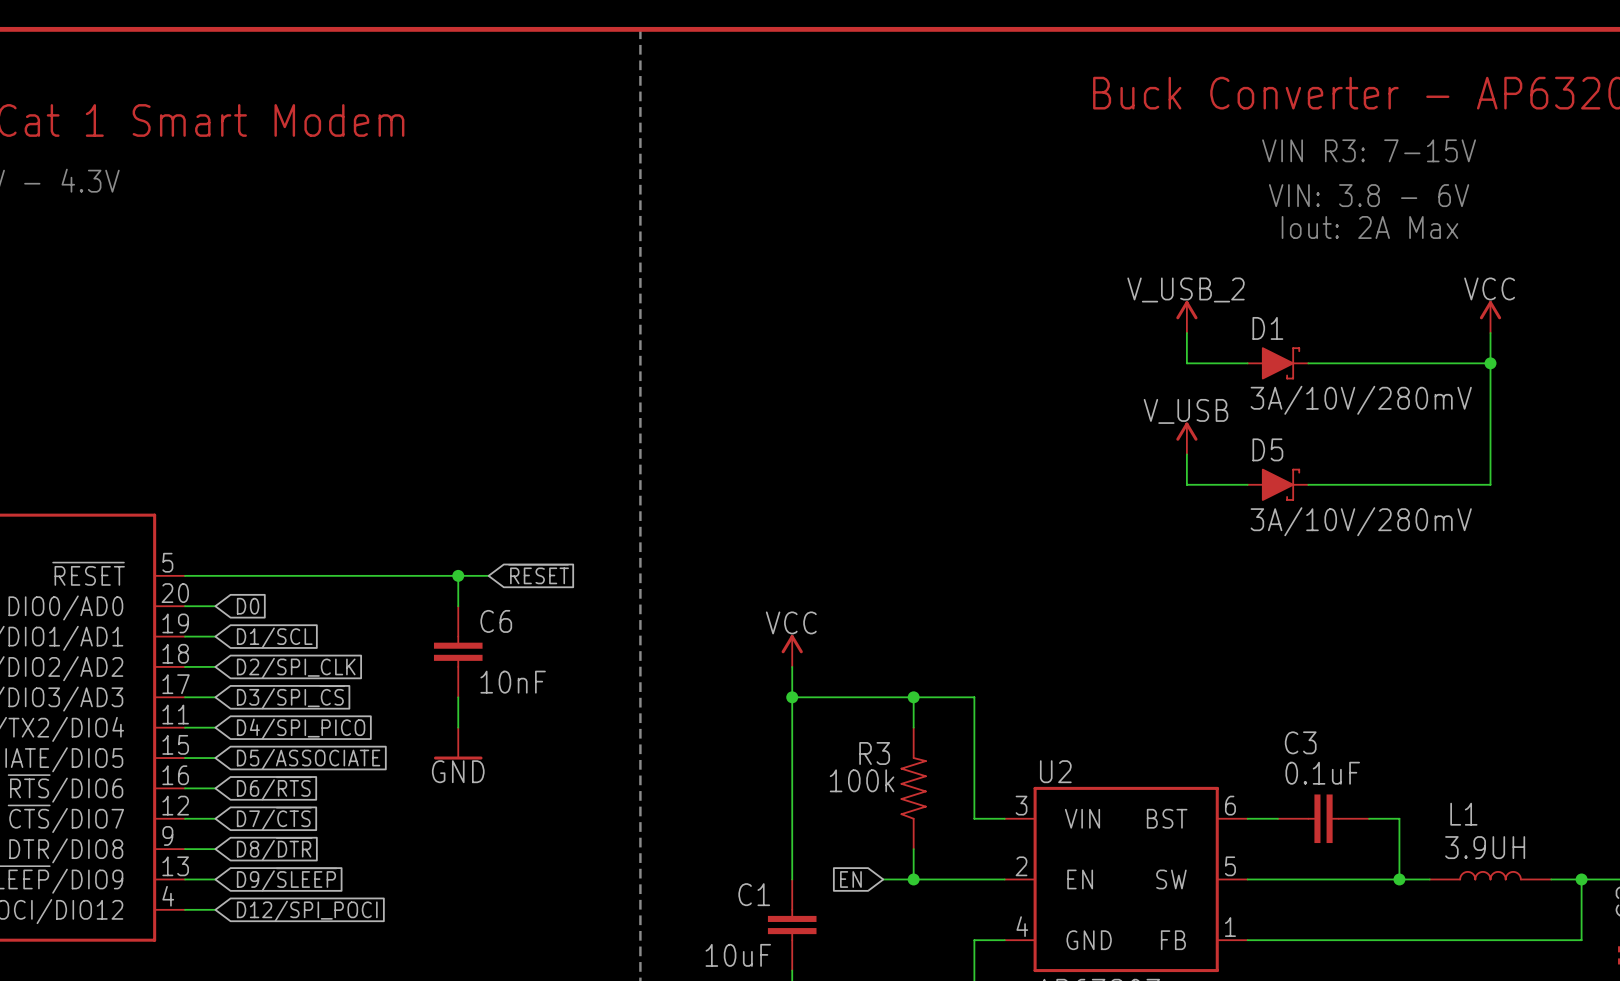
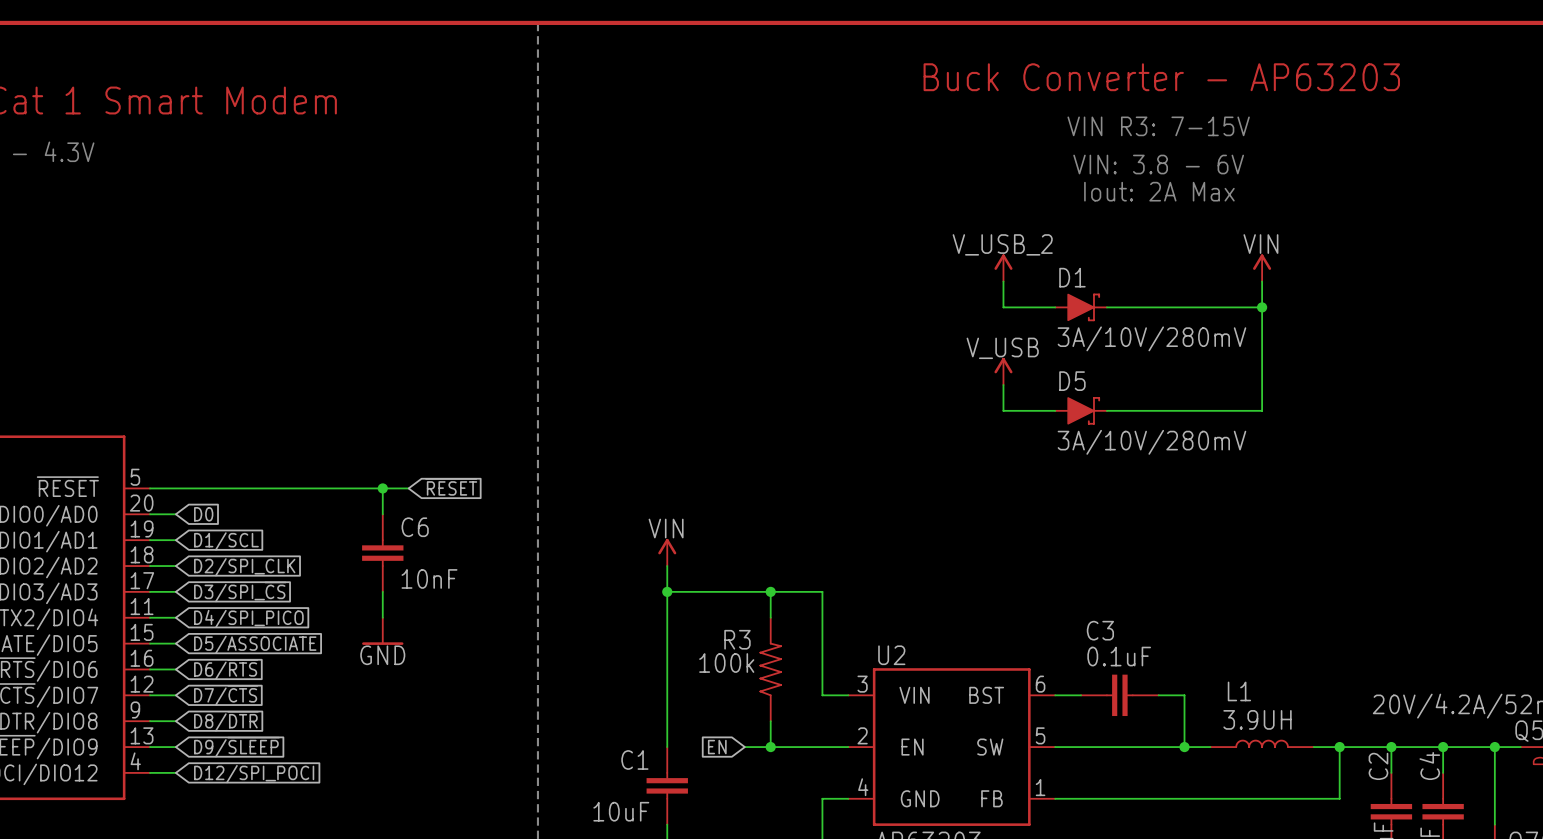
power symbol: VCC (1490, 317) -> VIN (1262, 267)
power symbol: VCC (792, 651) -> VIN (667, 552)

